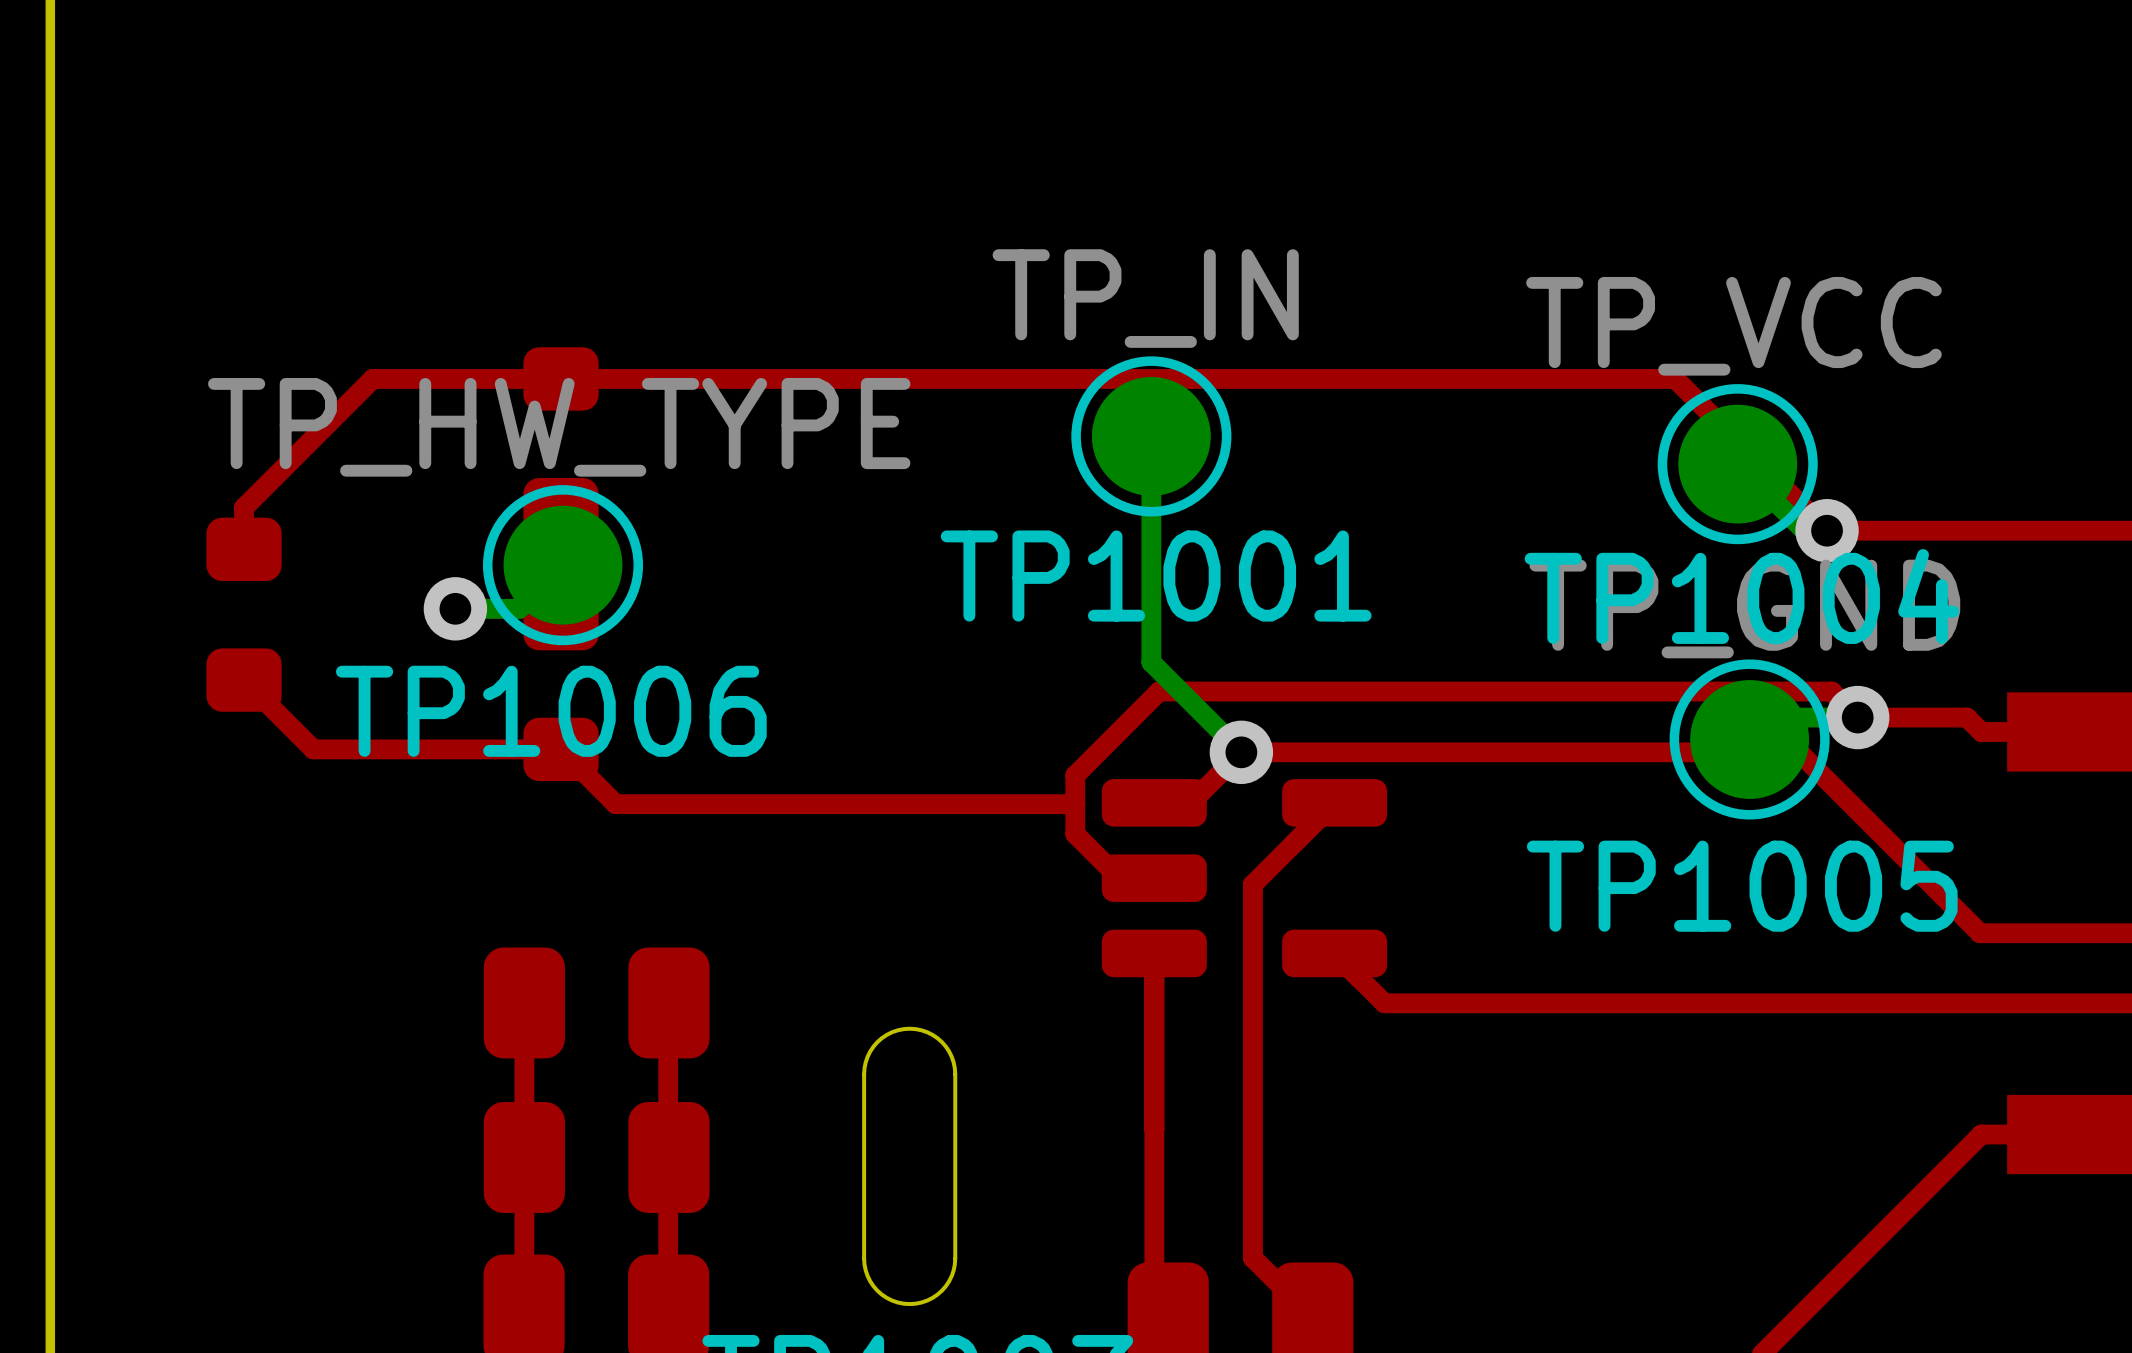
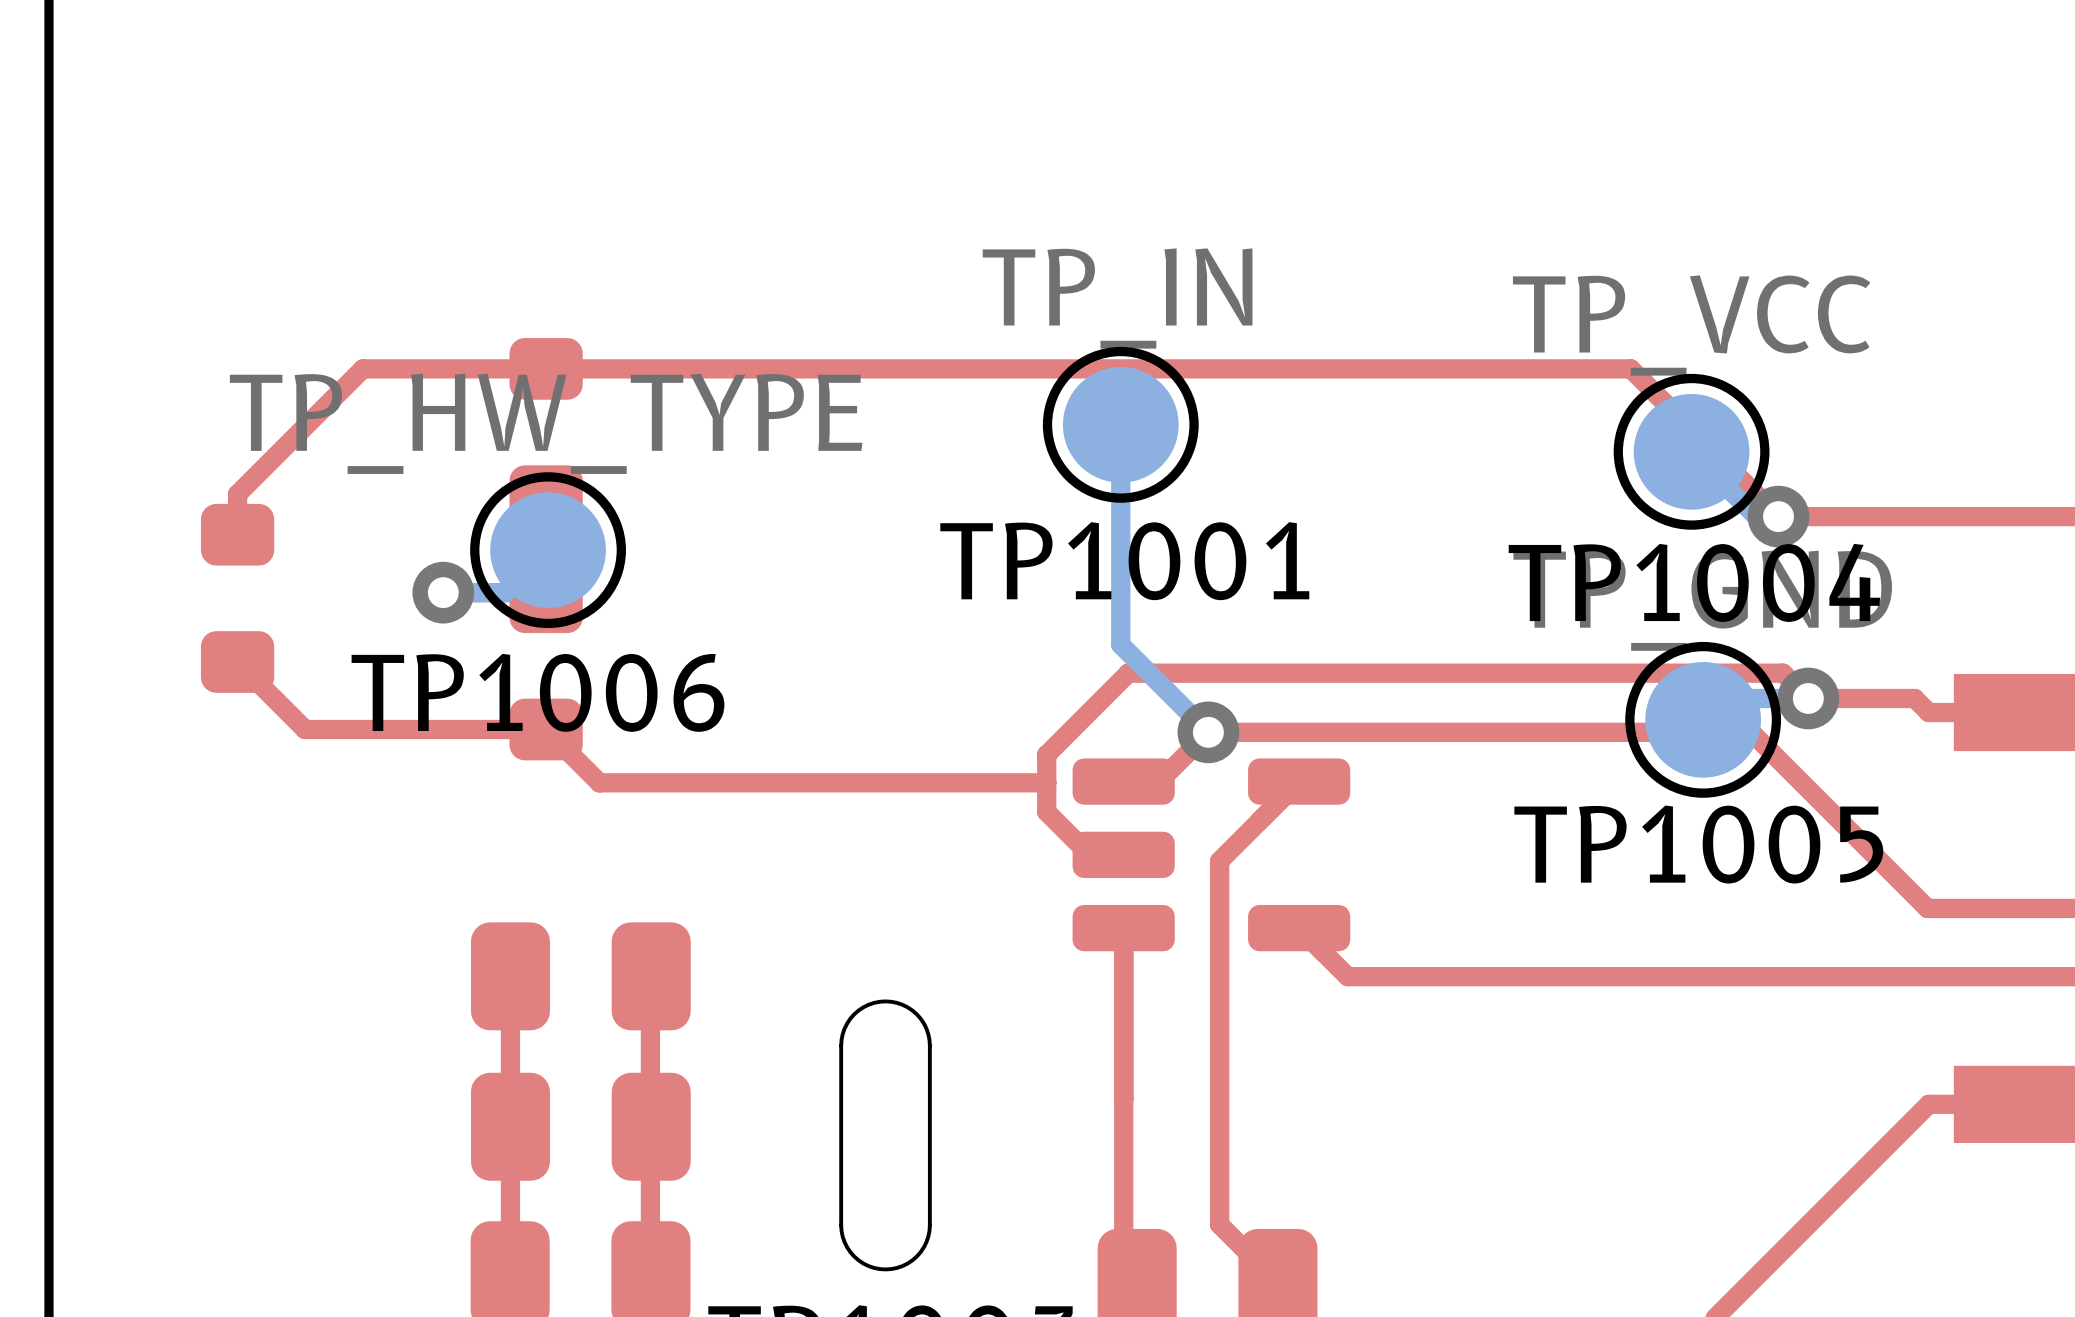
TP1005 name position: TP1005 (1742, 886) -> TP1005 (1698, 844)

